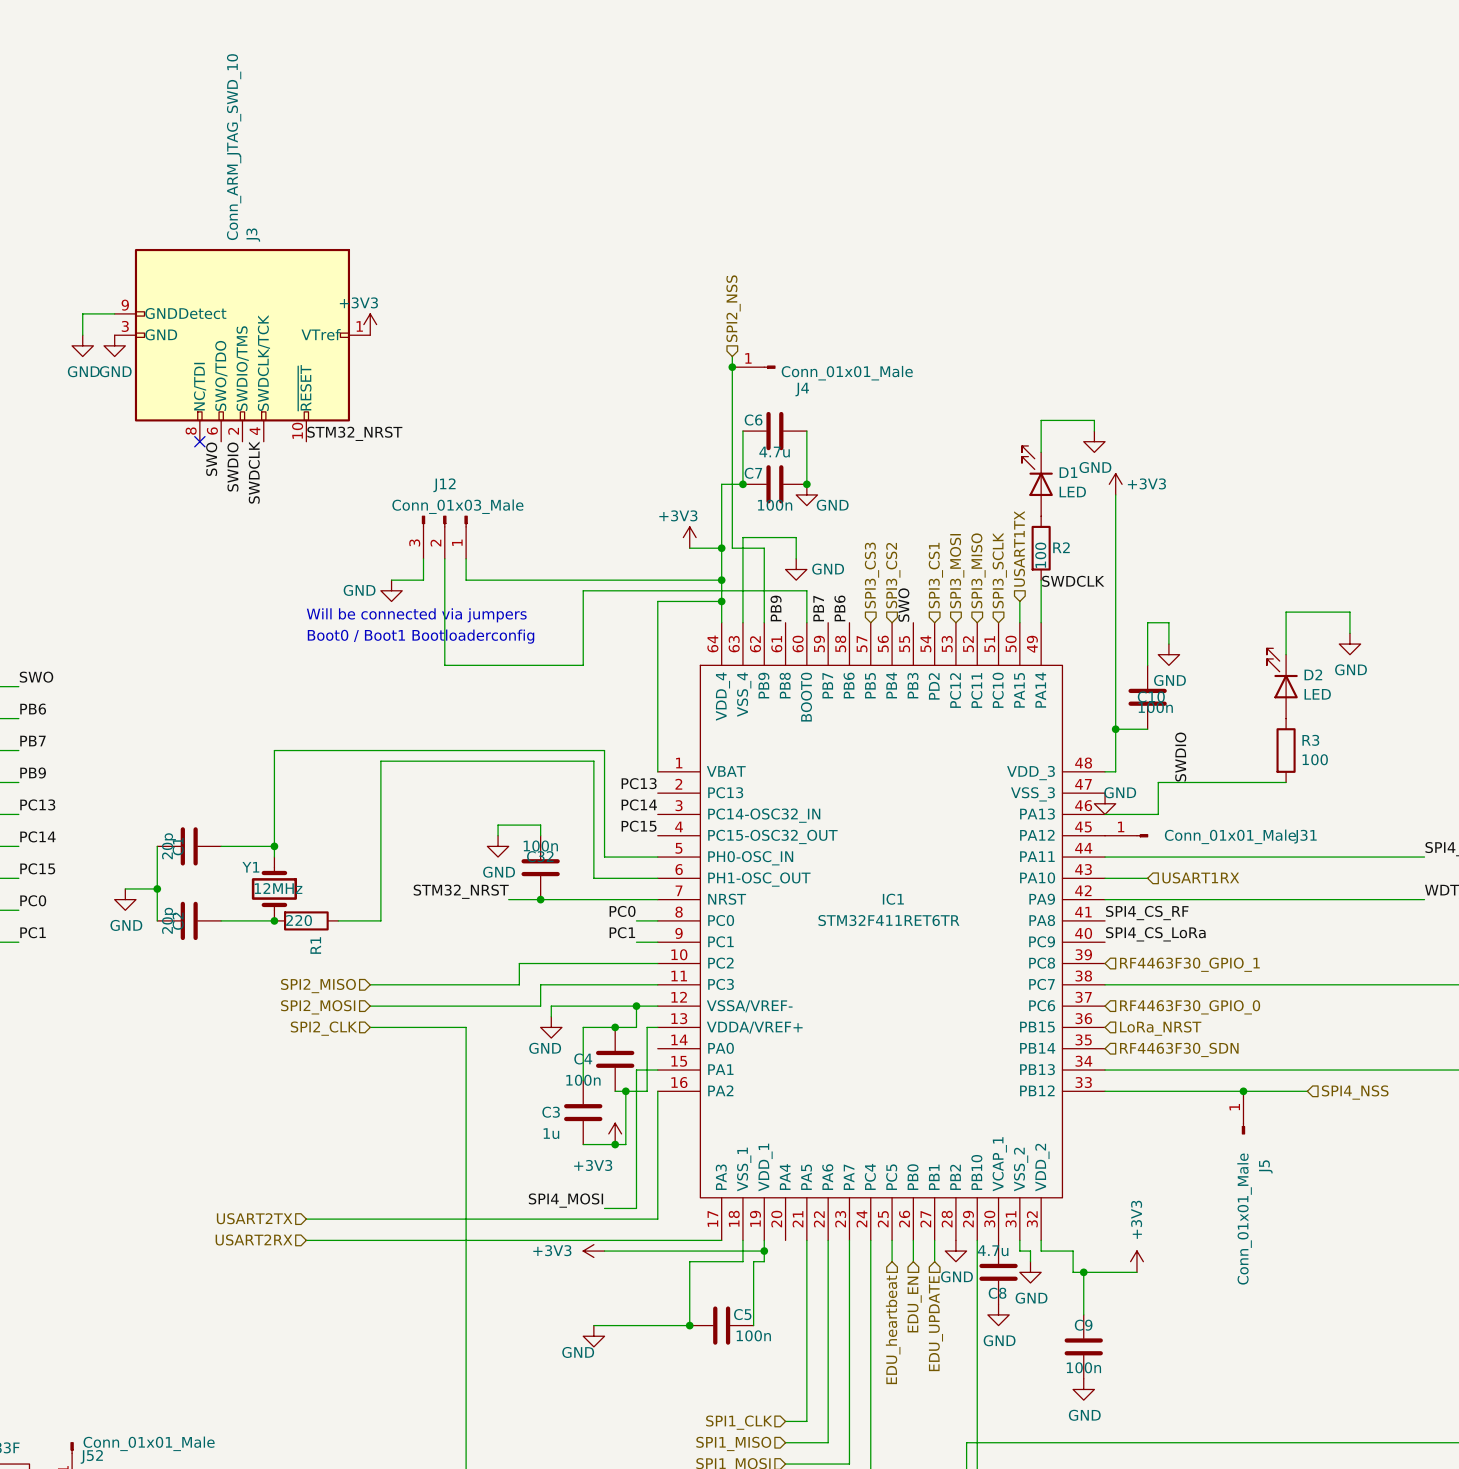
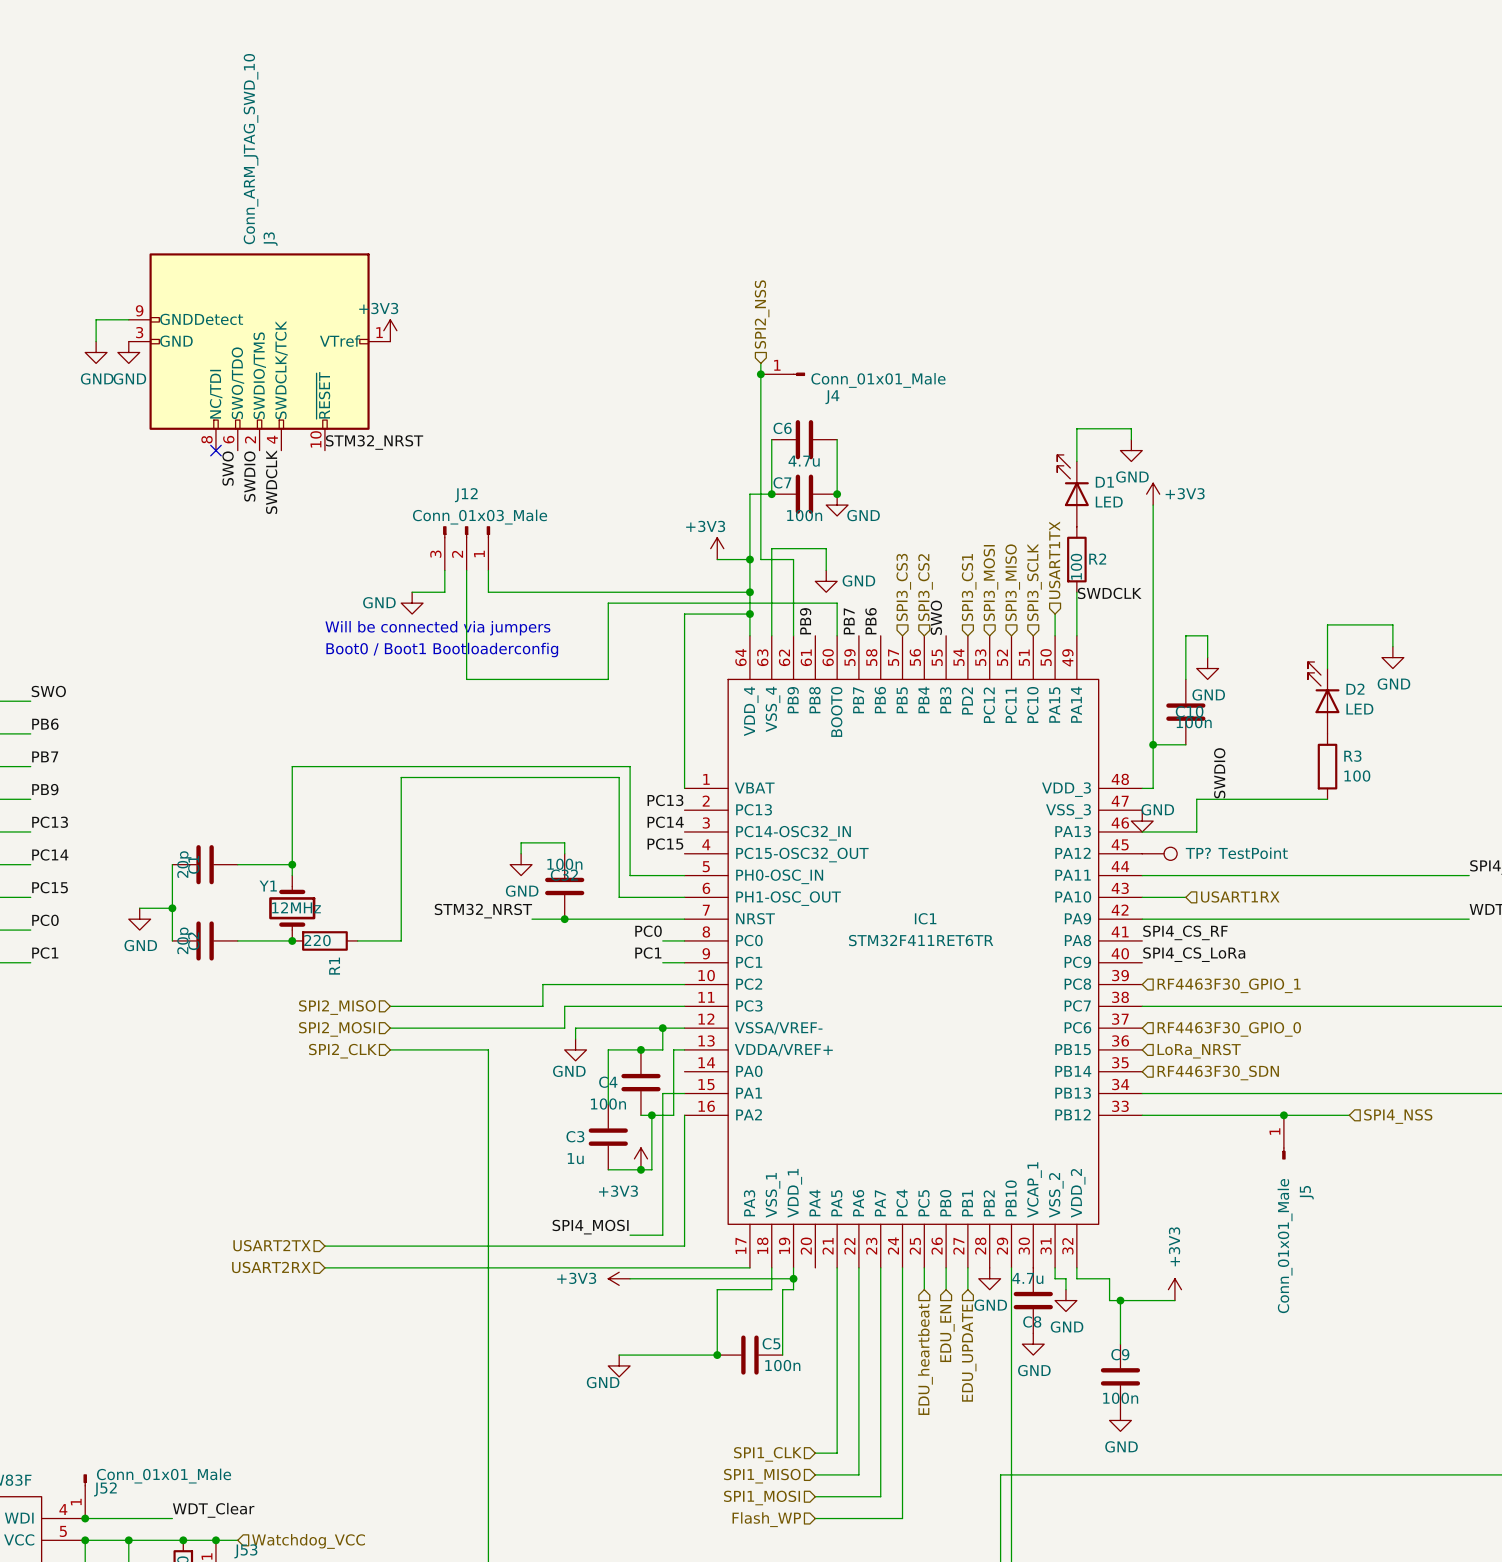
TP?: none -> TestPoint (1159, 853)
J31: Conn_01x01_Male (1126, 835) -> none

